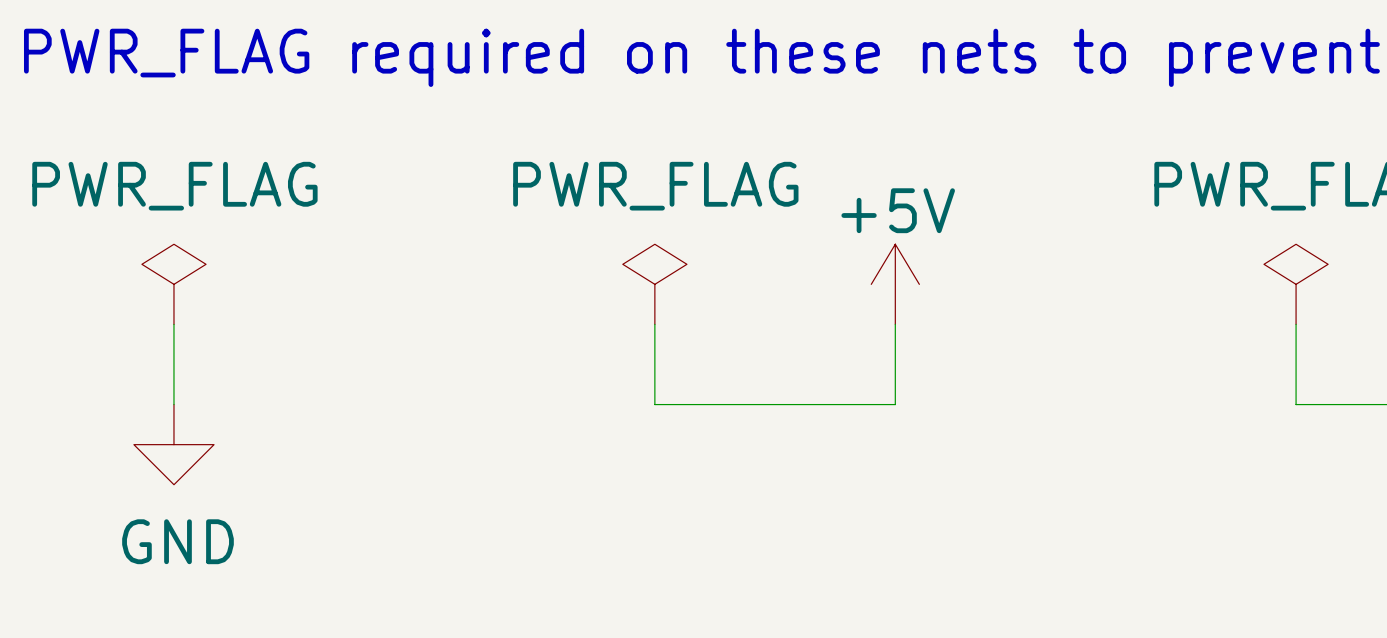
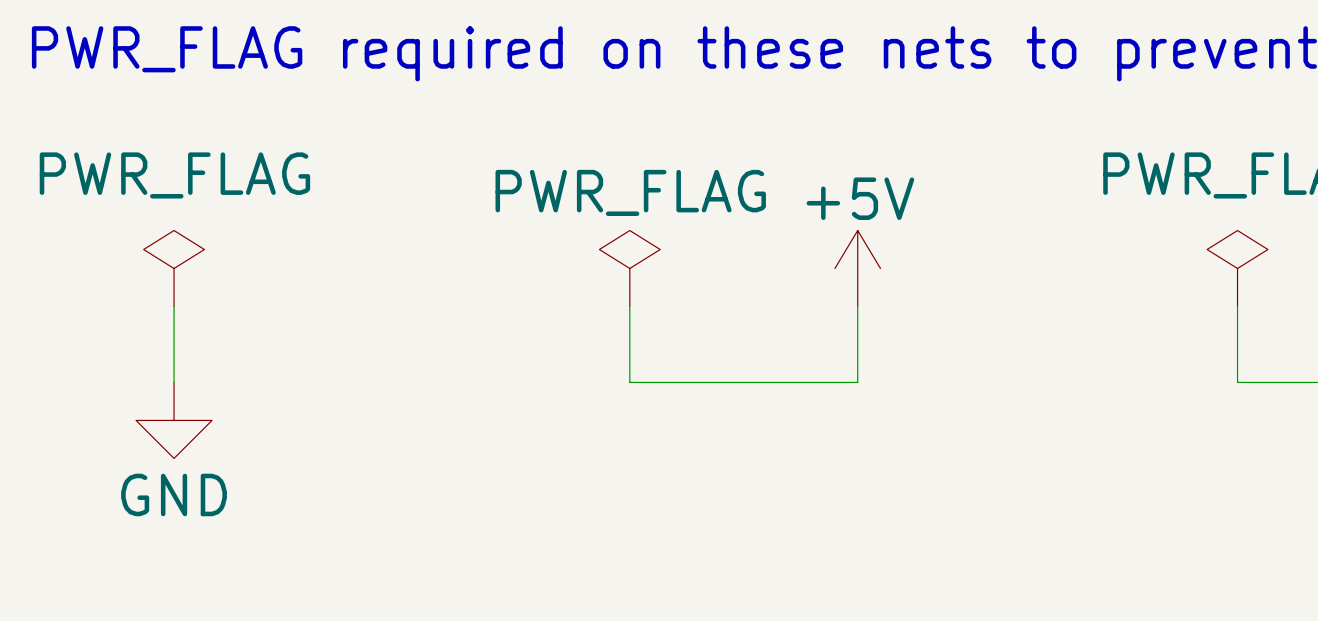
power symbol text position: PWR_FLAG (655, 186) -> PWR_FLAG (630, 192)
power symbol text position: GND (177, 541) -> GND (174, 494)

